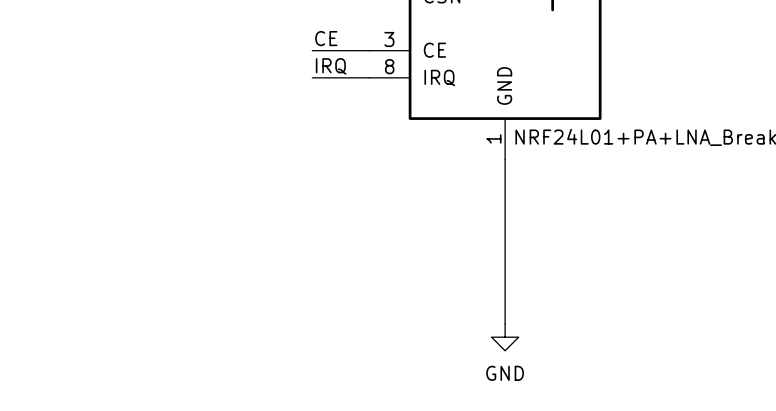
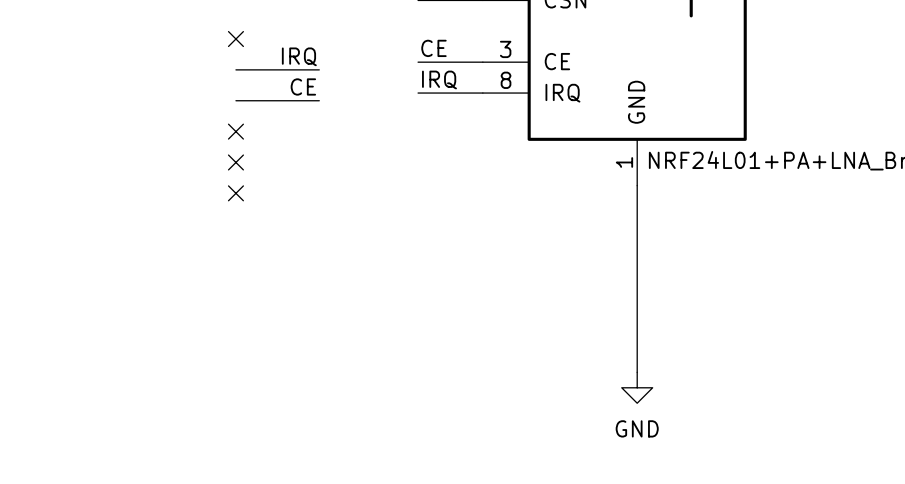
no-connect mark: none -> (235, 39)
label: none -> IRQ (299, 56)
wire: none -> (235, 69) (319, 69)
label: none -> CE (303, 86)
wire: none -> (235, 100) (319, 100)
no-connect mark: none -> (235, 131)
no-connect mark: none -> (235, 162)
no-connect mark: none -> (235, 193)

